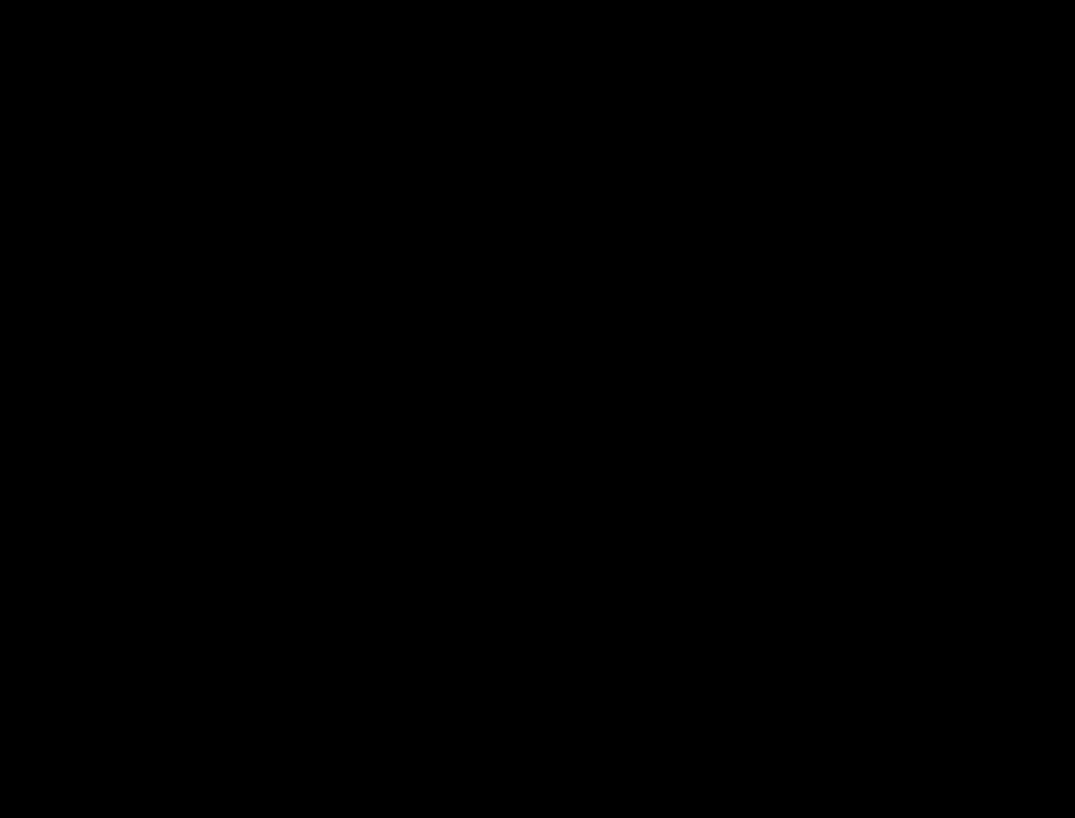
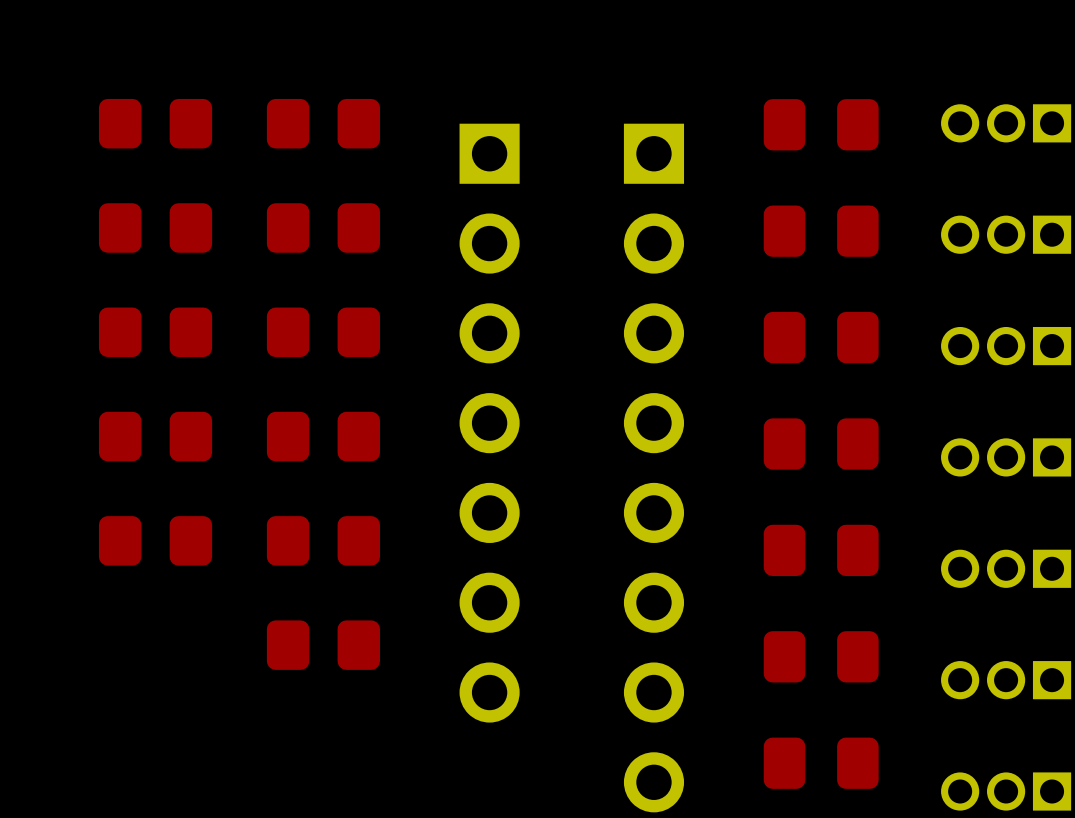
part: none -> (155, 123)
part: none -> (323, 123)
part: none -> (1006, 123)
part: none -> (821, 124)
part: none -> (155, 227)
part: none -> (323, 227)
part: none -> (821, 231)
part: none -> (1006, 234)
part: none -> (155, 332)
part: none -> (323, 332)
part: none -> (821, 337)
part: none -> (1006, 346)
part: none -> (489, 423)
part: none -> (155, 436)
part: none -> (323, 436)
part: none -> (821, 443)
part: none -> (1006, 457)
part: none -> (653, 468)
part: none -> (155, 540)
part: none -> (323, 540)
part: none -> (821, 550)
part: none -> (1006, 568)
part: none -> (323, 645)
part: none -> (821, 656)
part: none -> (1006, 680)
part: none -> (821, 763)
part: none -> (1006, 791)

